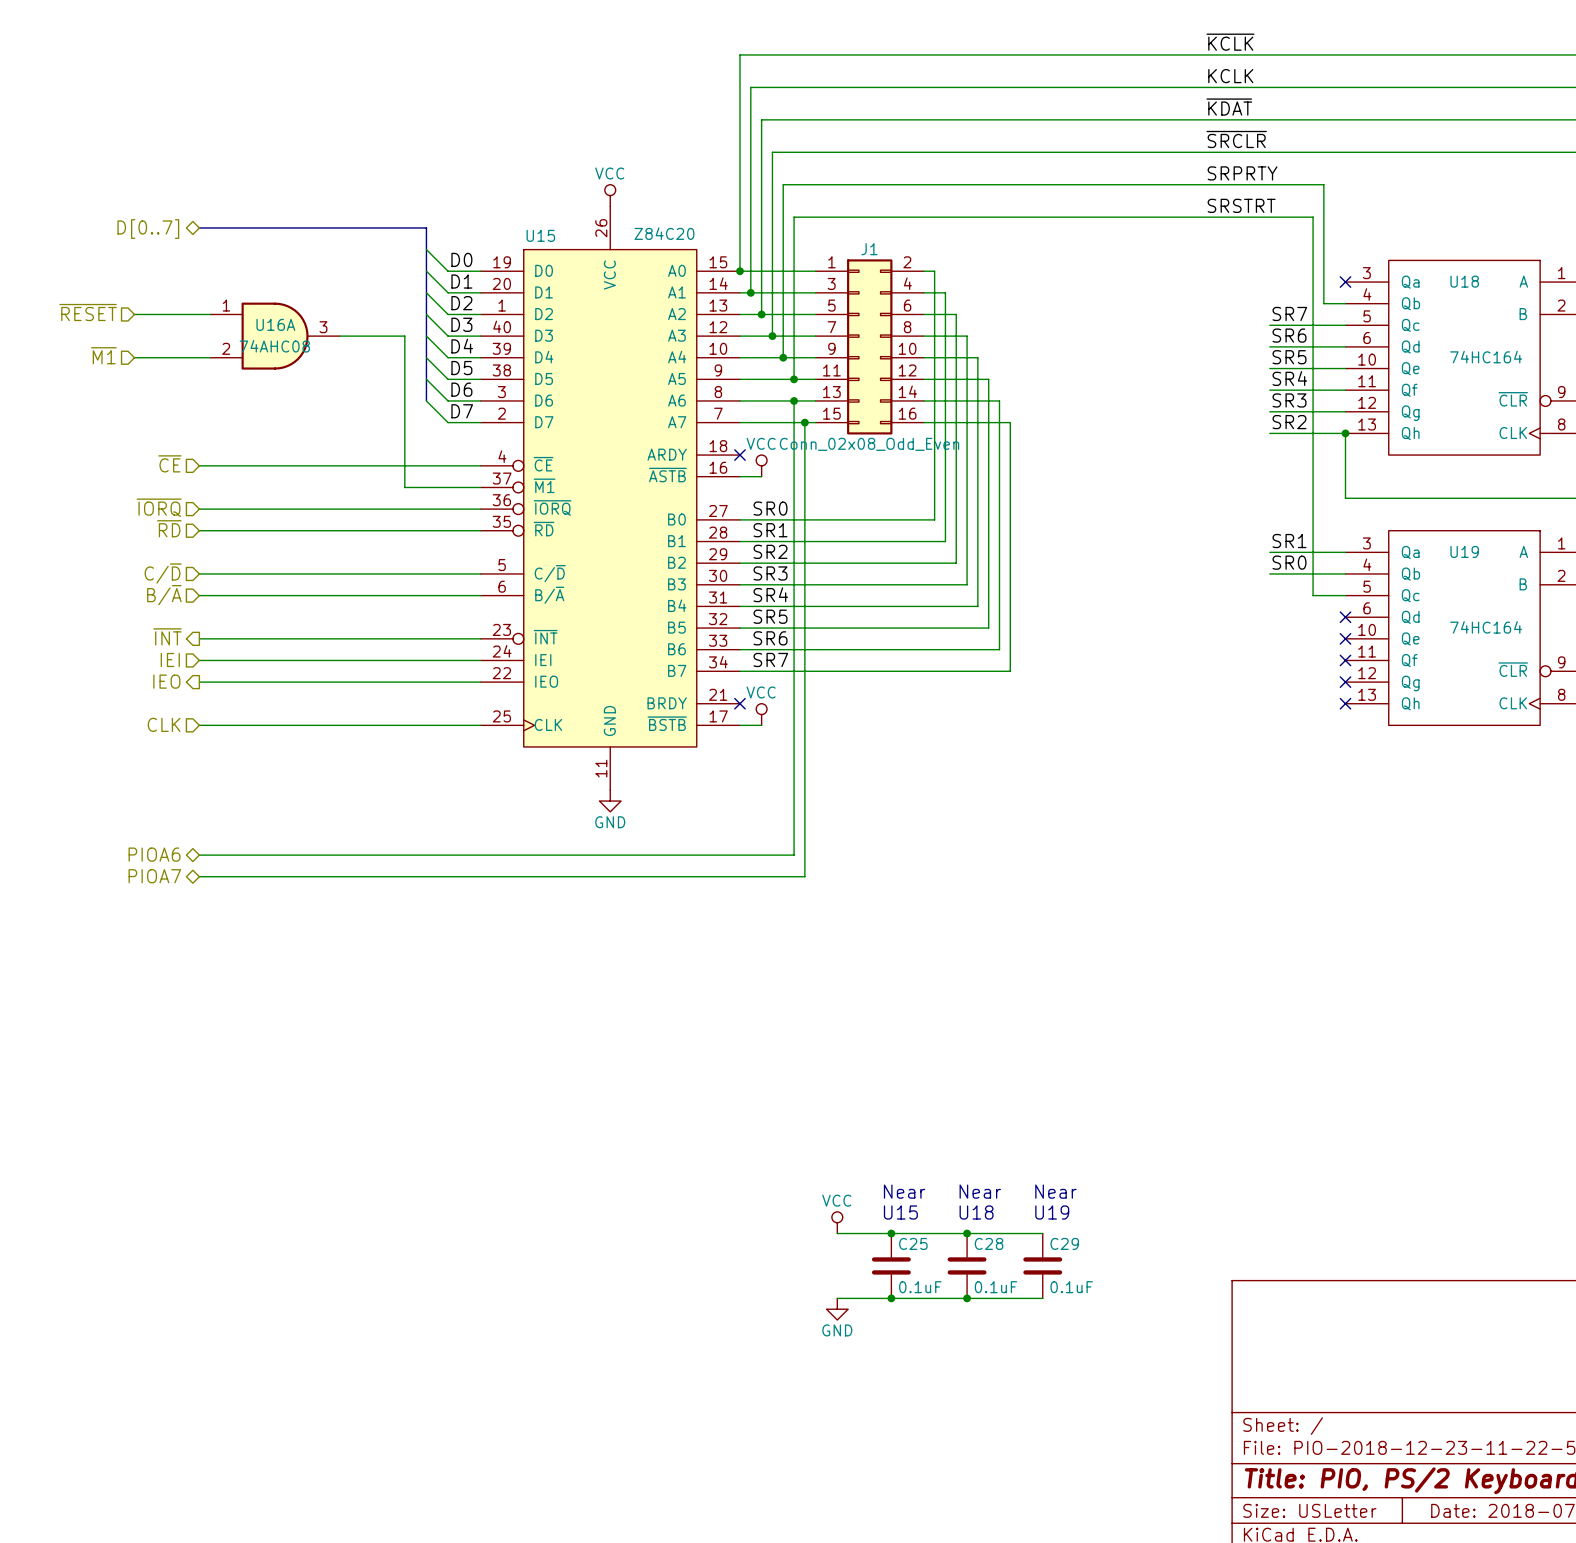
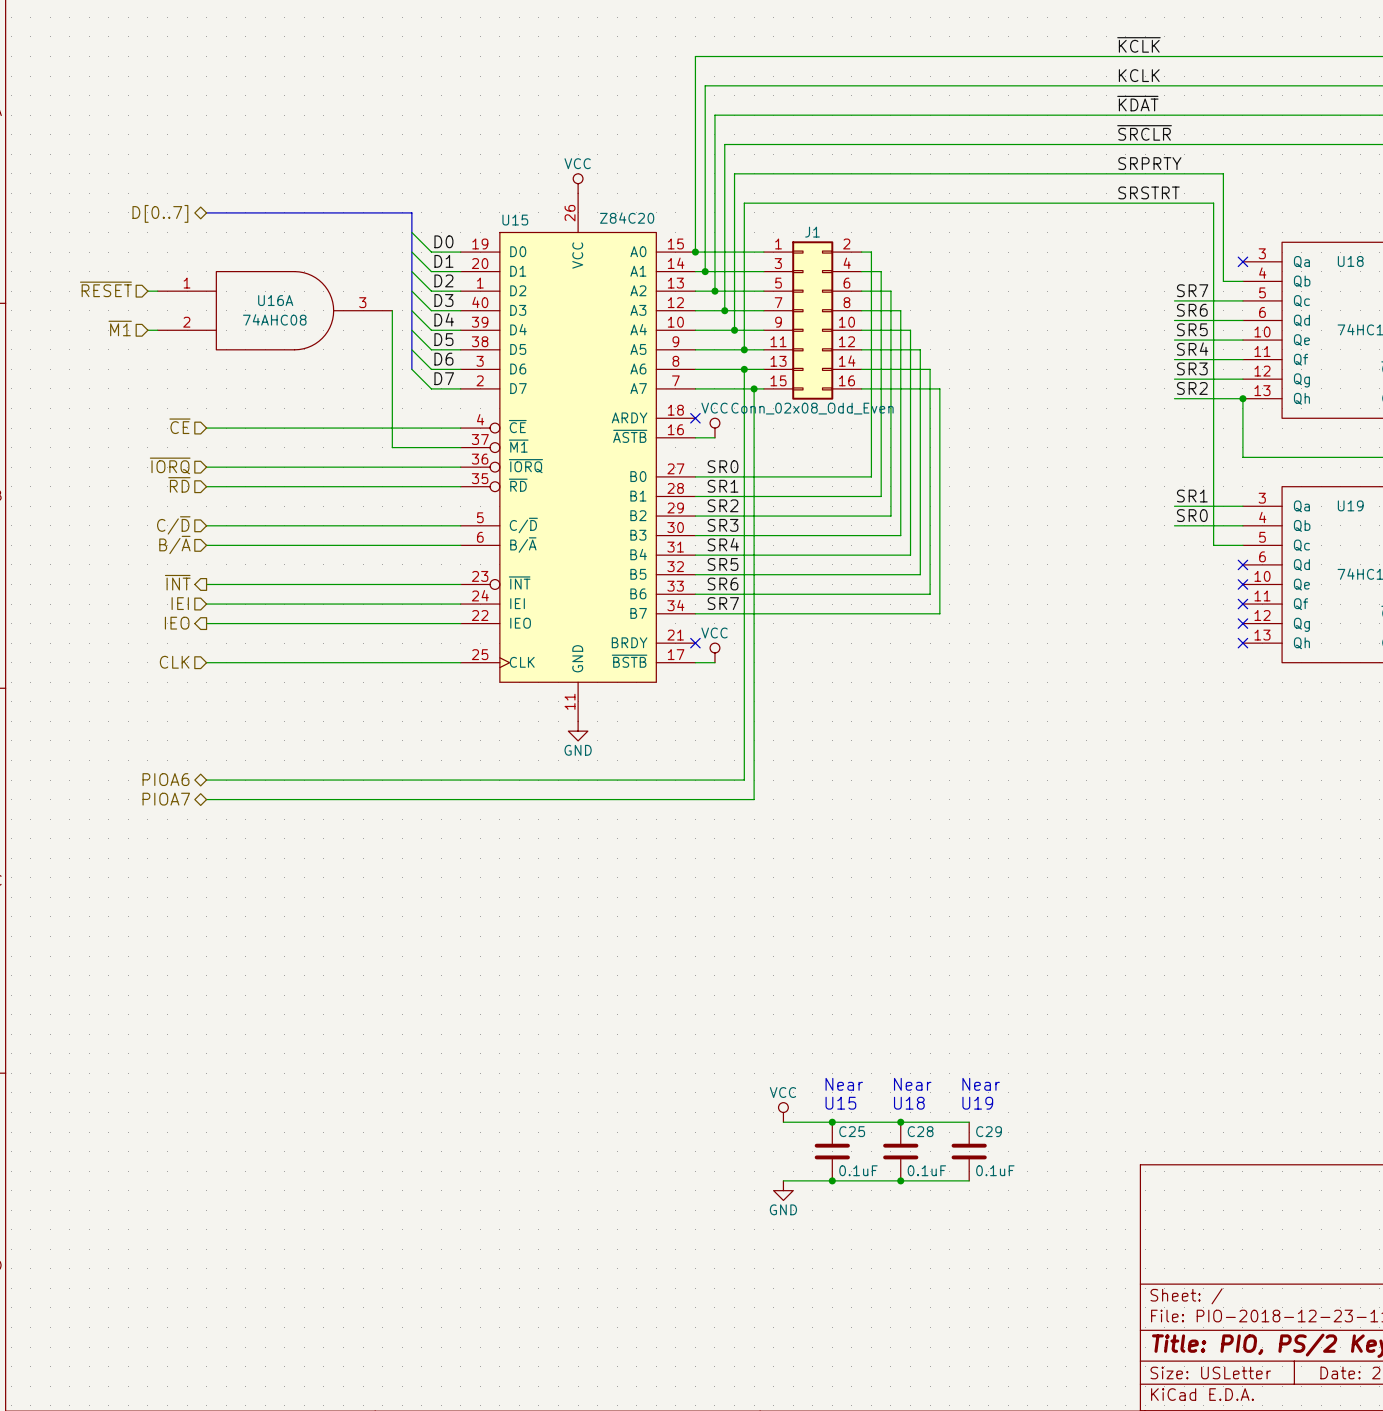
U16A symbol: [210, 302, 340, 370] -> [157, 271, 393, 350]

